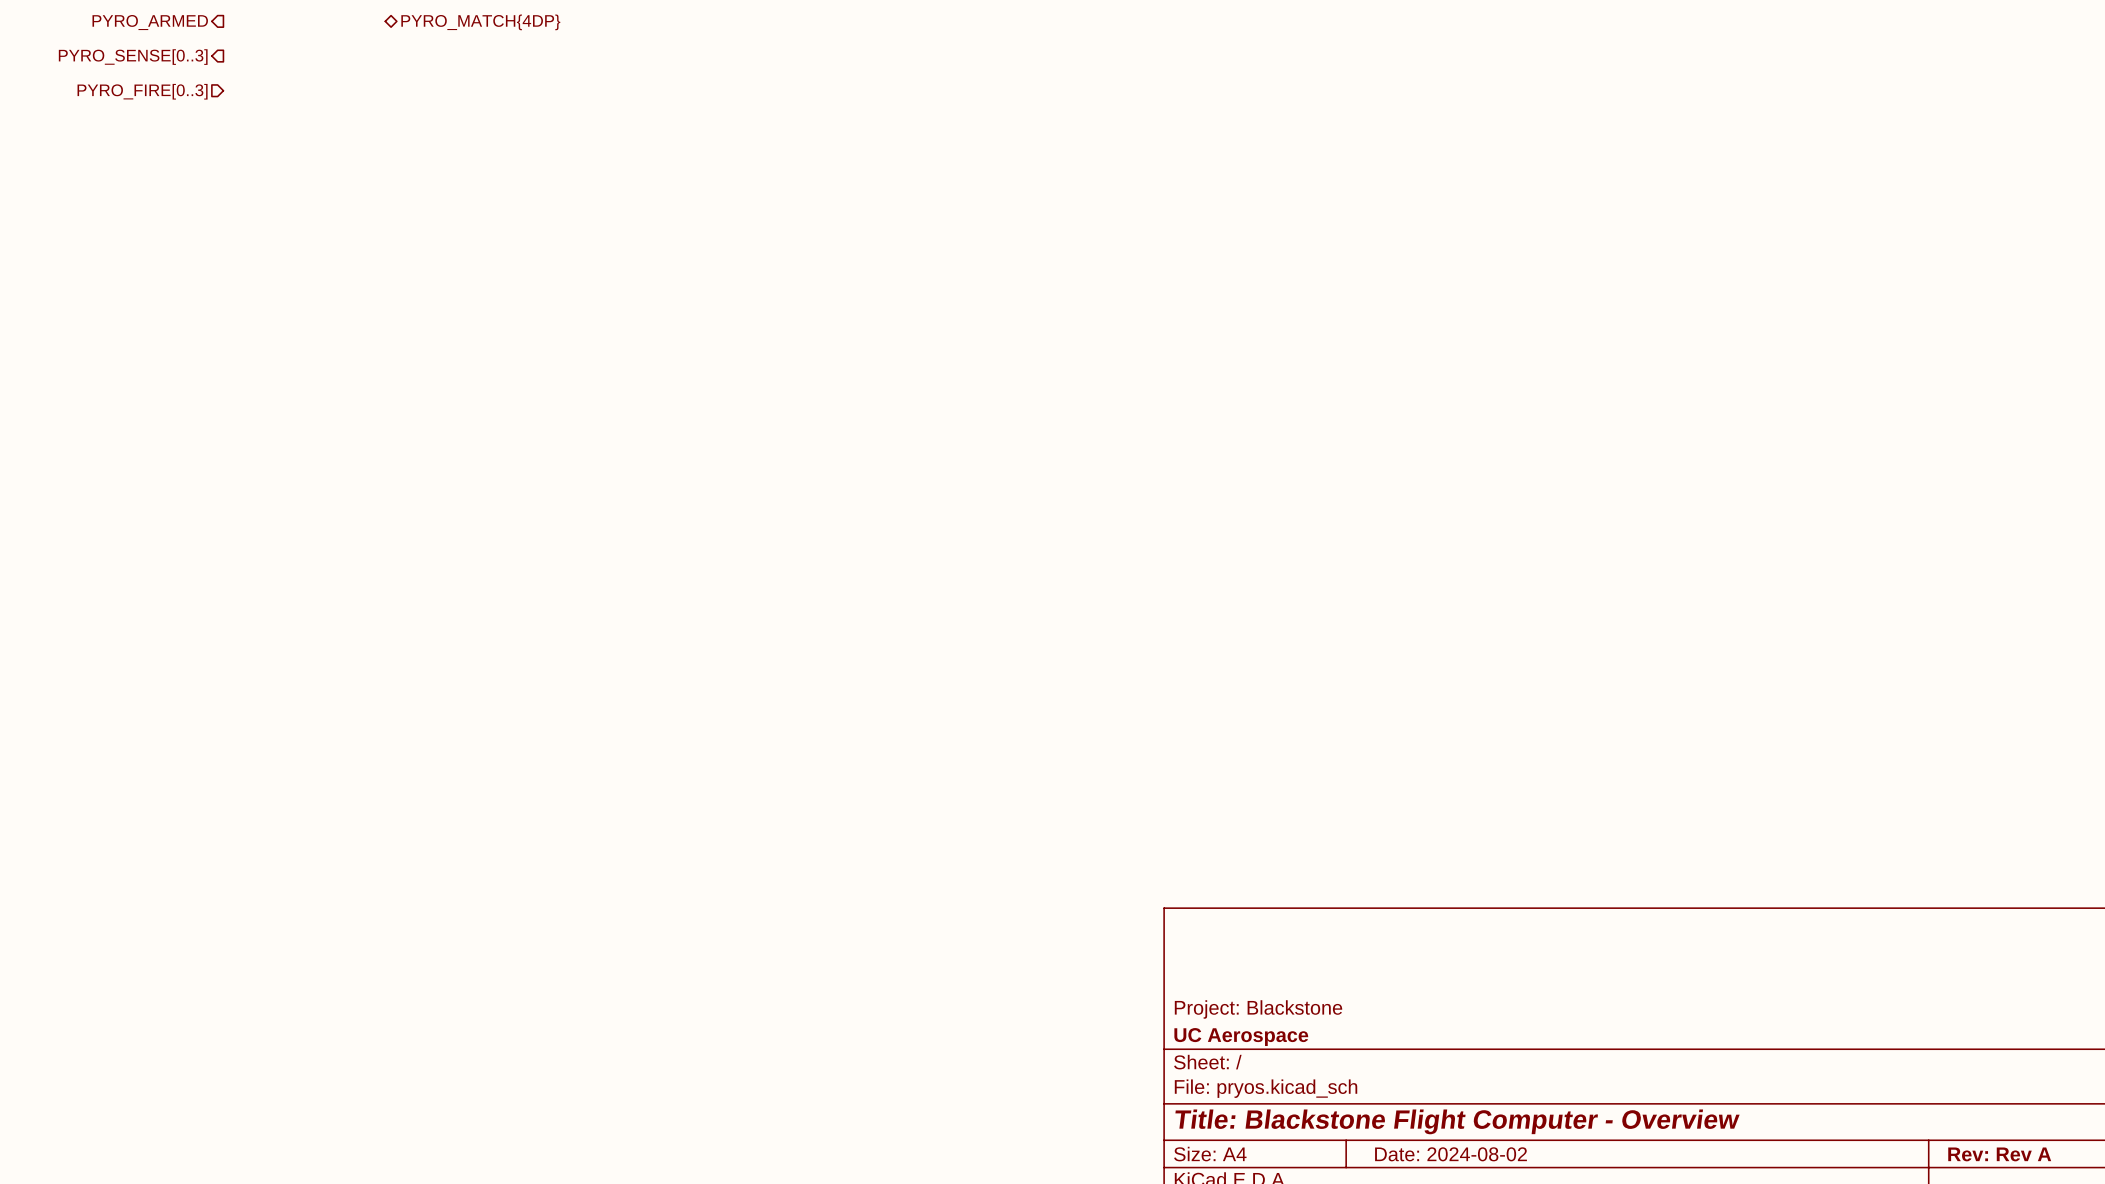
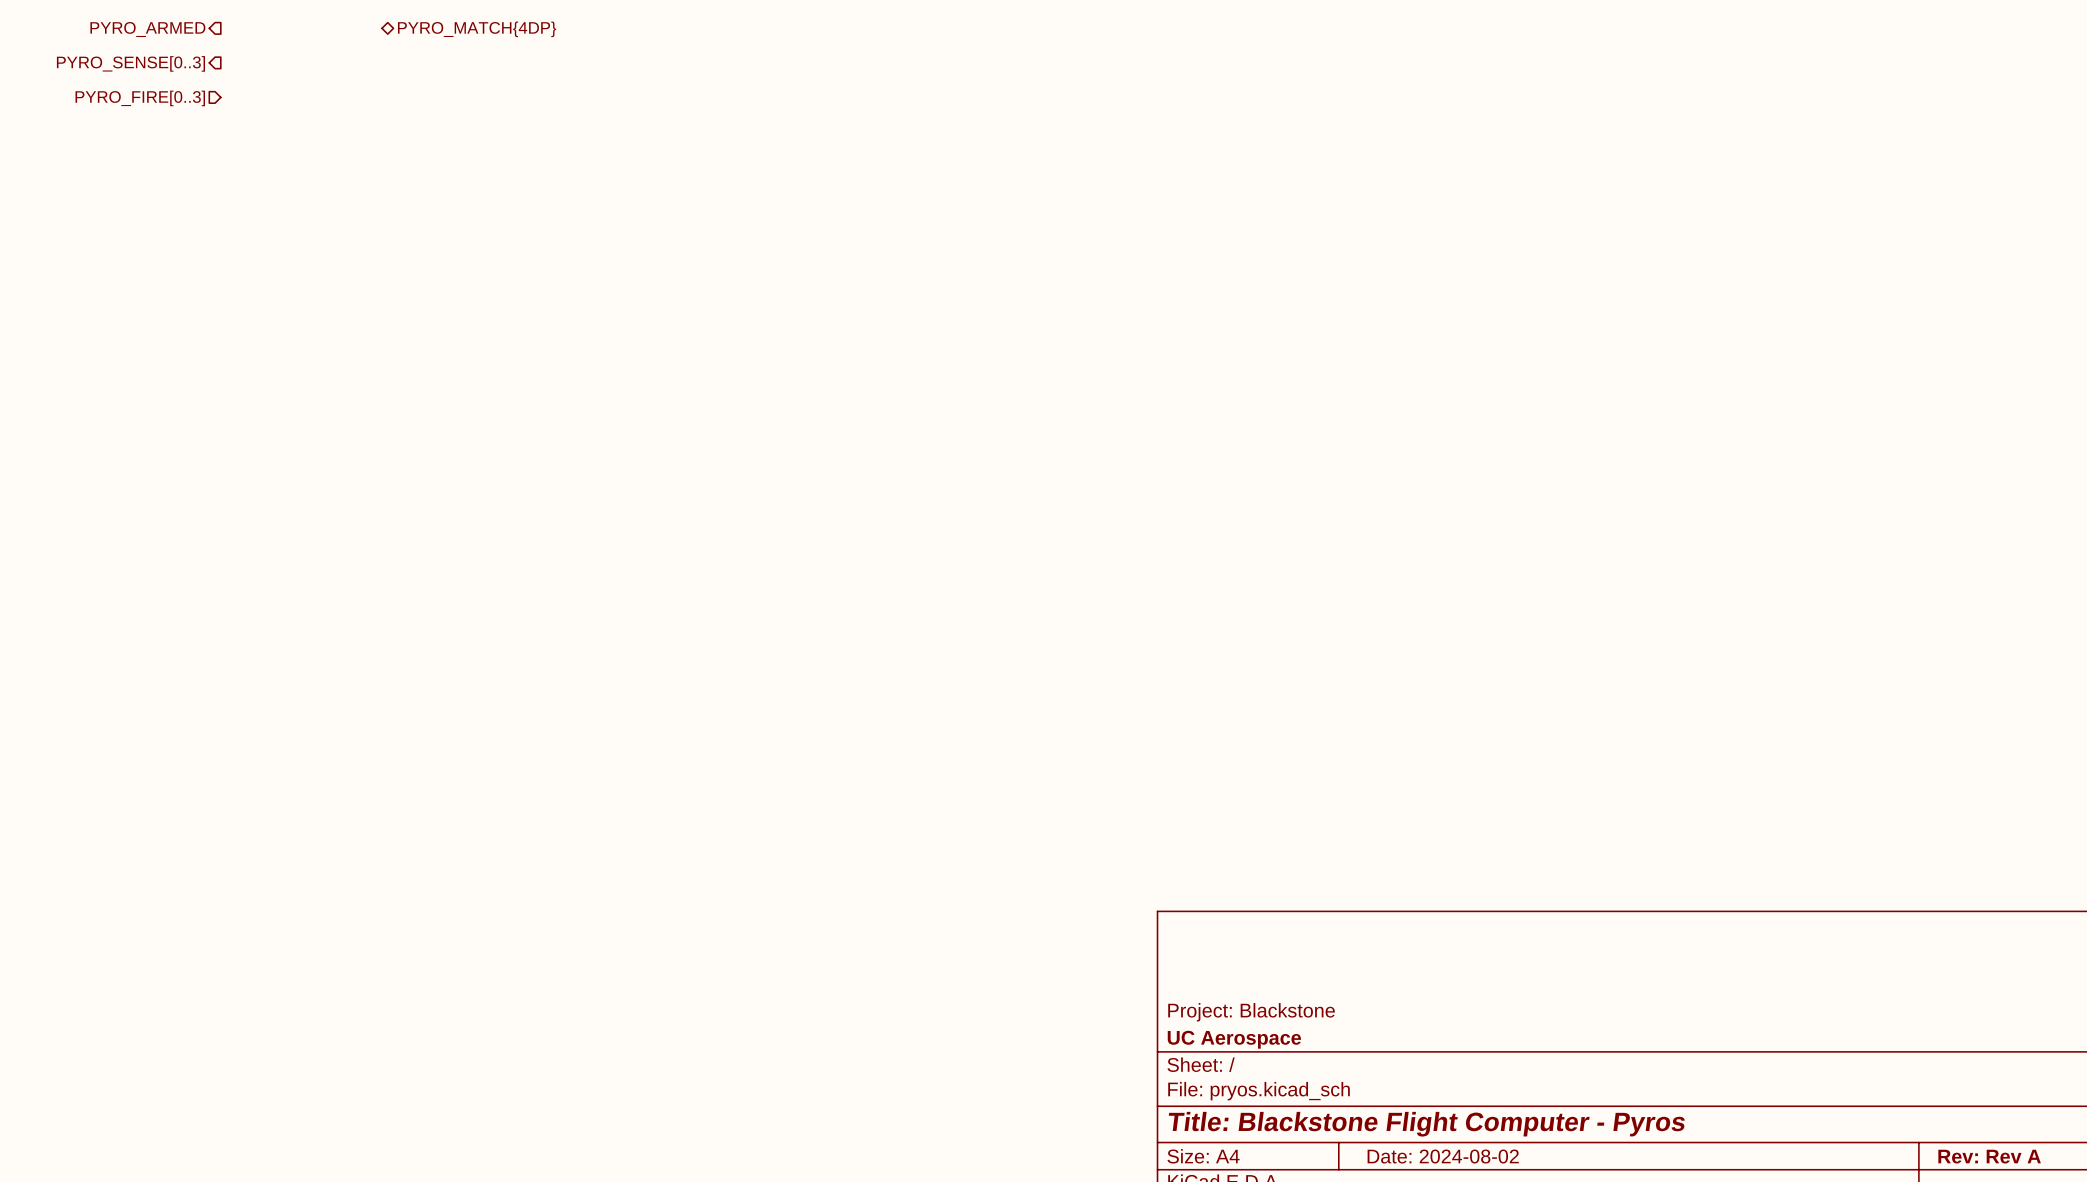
title block: Title: Blackstone Flight Computer - Overview (1457, 1121) -> Title: Blackstone Flight Computer - Pyros (1426, 1124)

